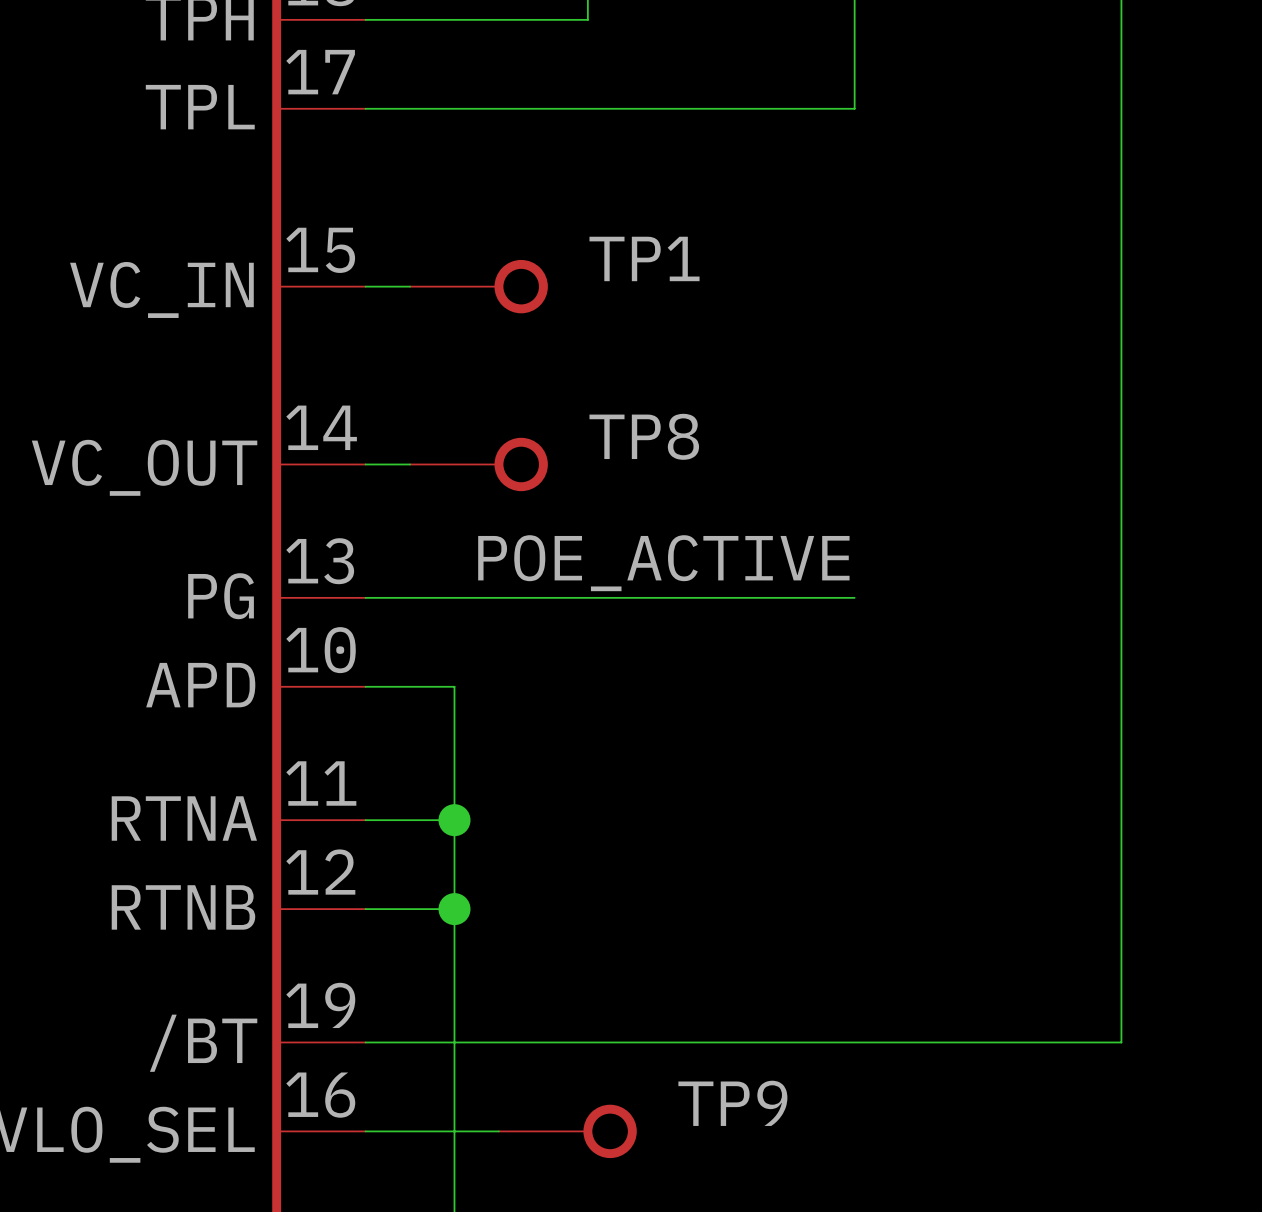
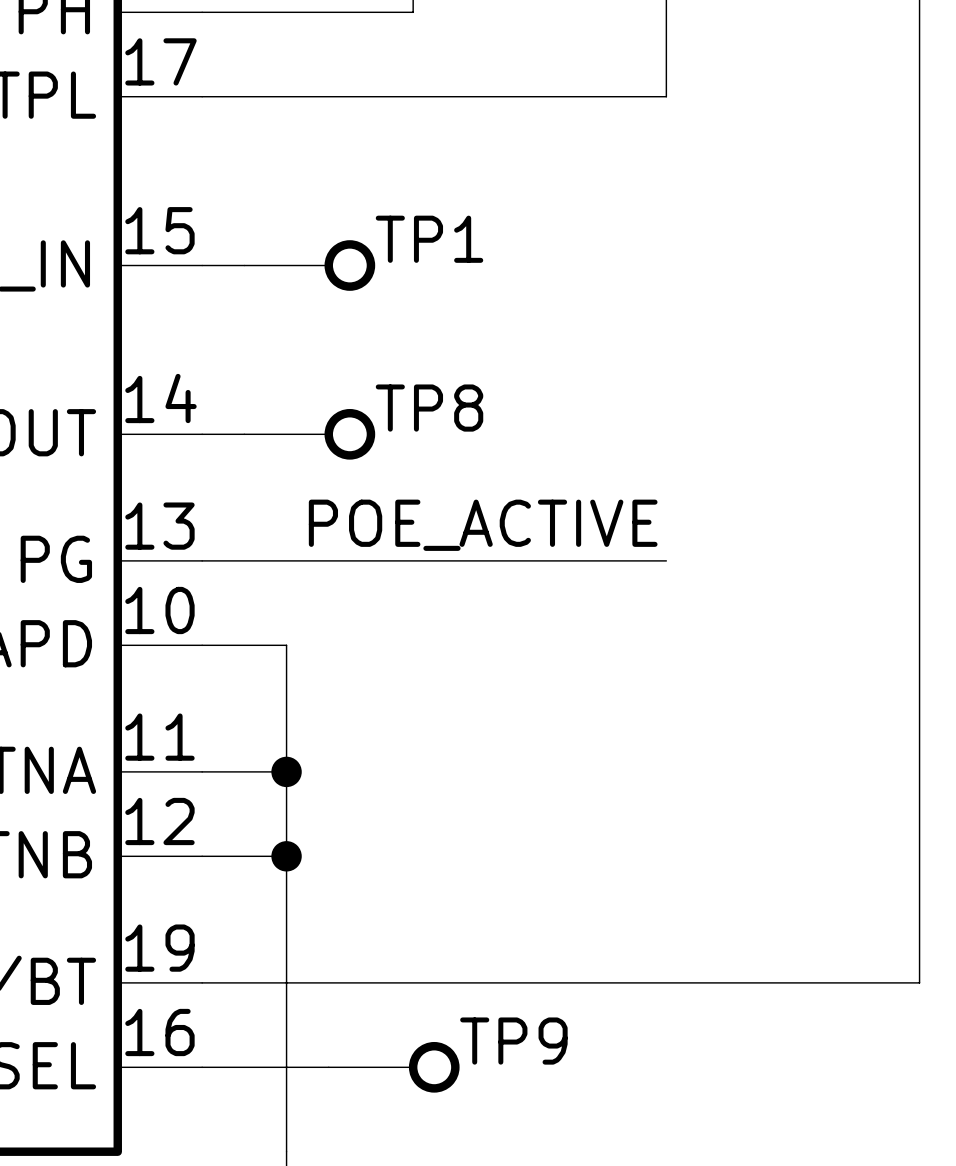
TP1 name position: TP1 (644, 258) -> TP1 (429, 239)
TP8 name position: TP8 (644, 436) -> TP8 (429, 408)
TP9 name position: TP9 (732, 1103) -> TP9 (513, 1041)

